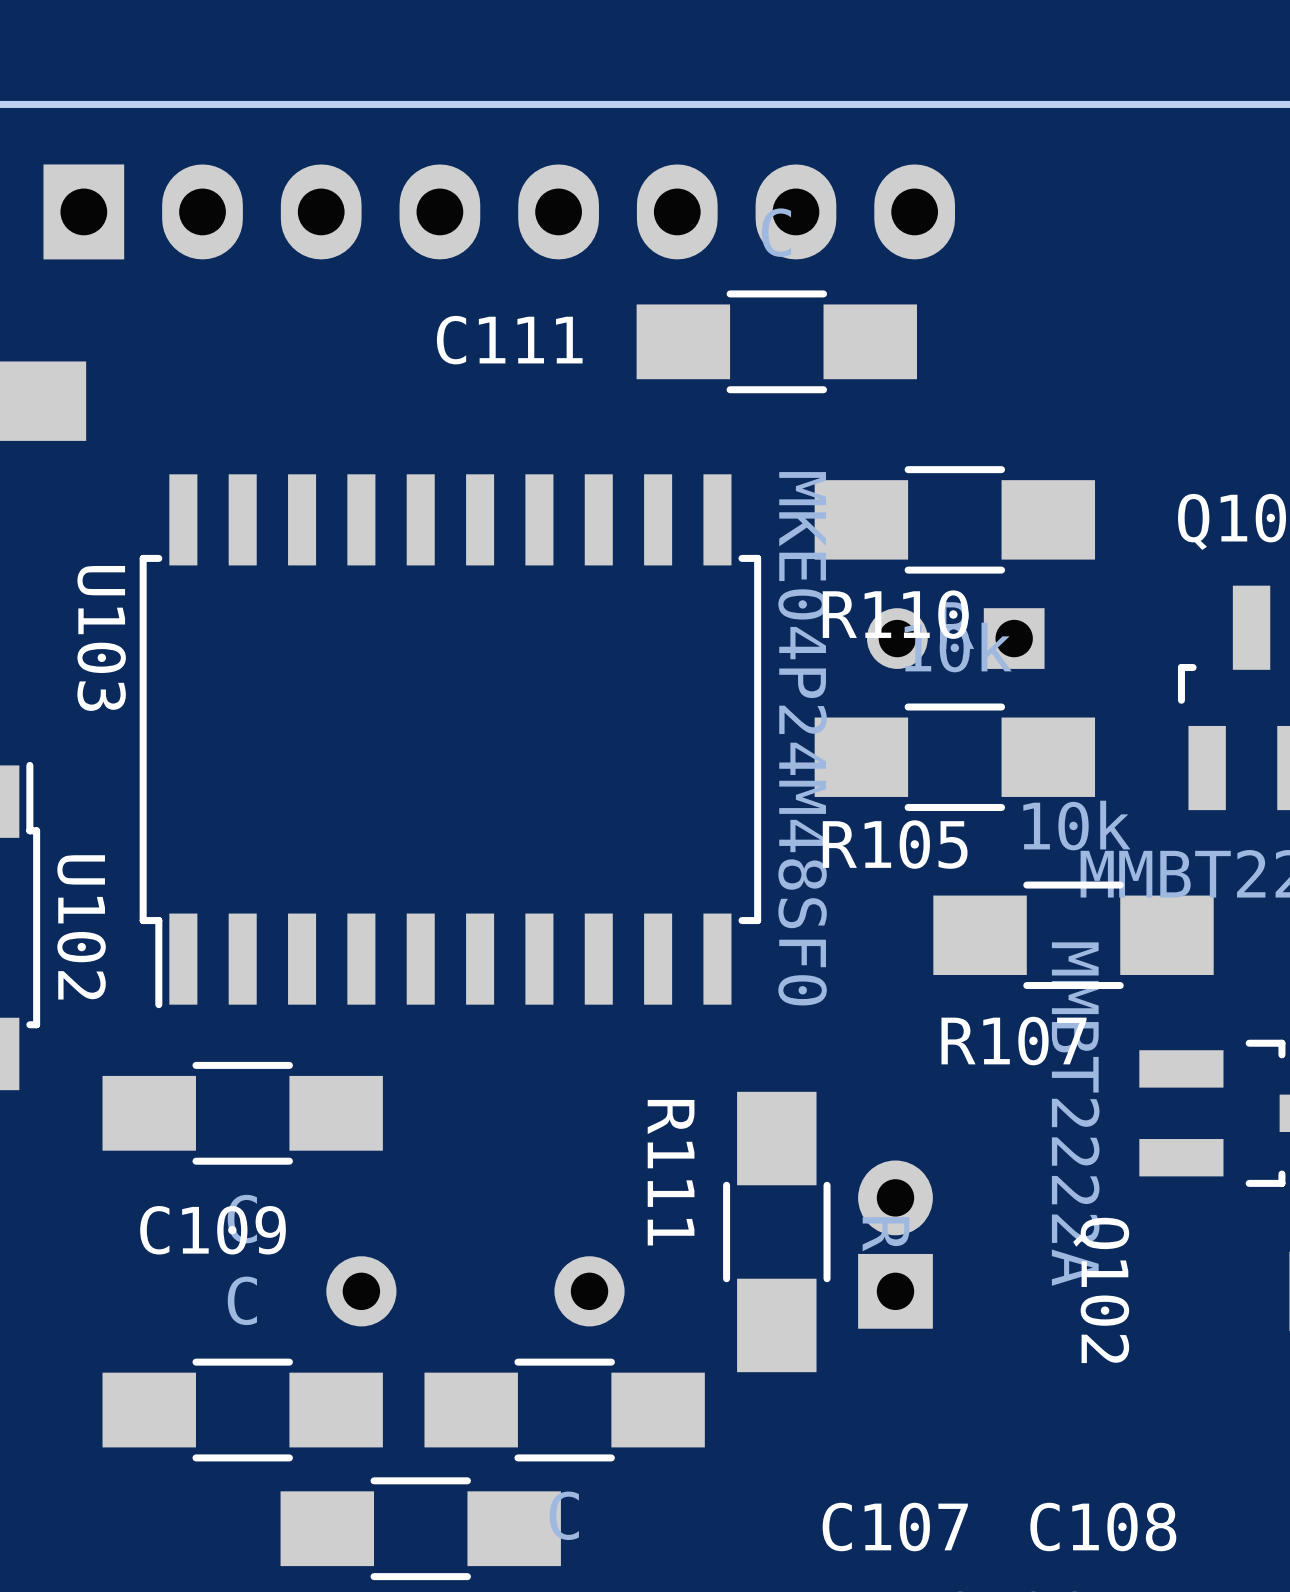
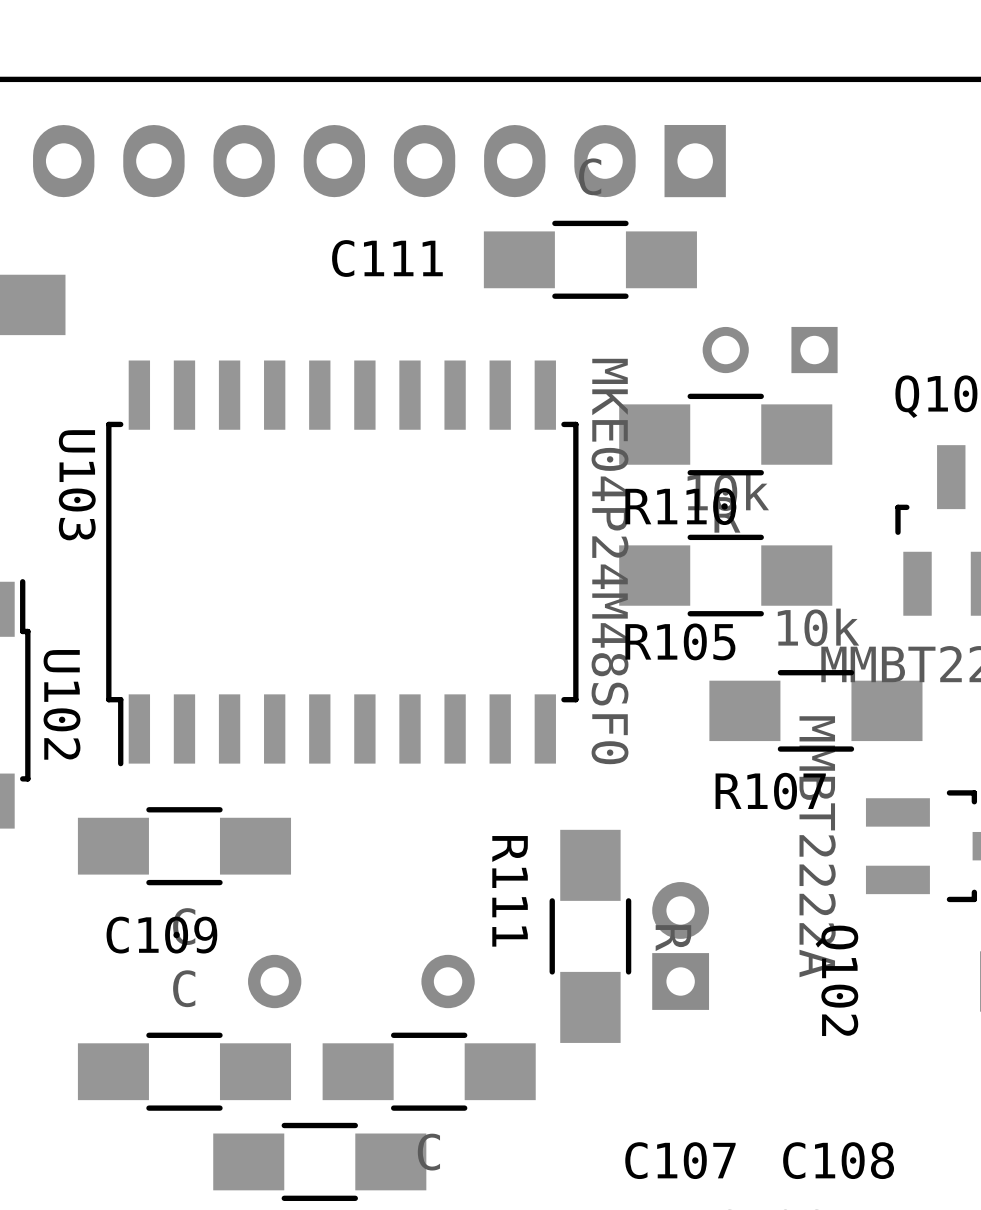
part rotation: 0° (499, 211) -> 180° (379, 161)
R110 position: (954, 519) -> (725, 434)
part position: (955, 638) -> (770, 350)

